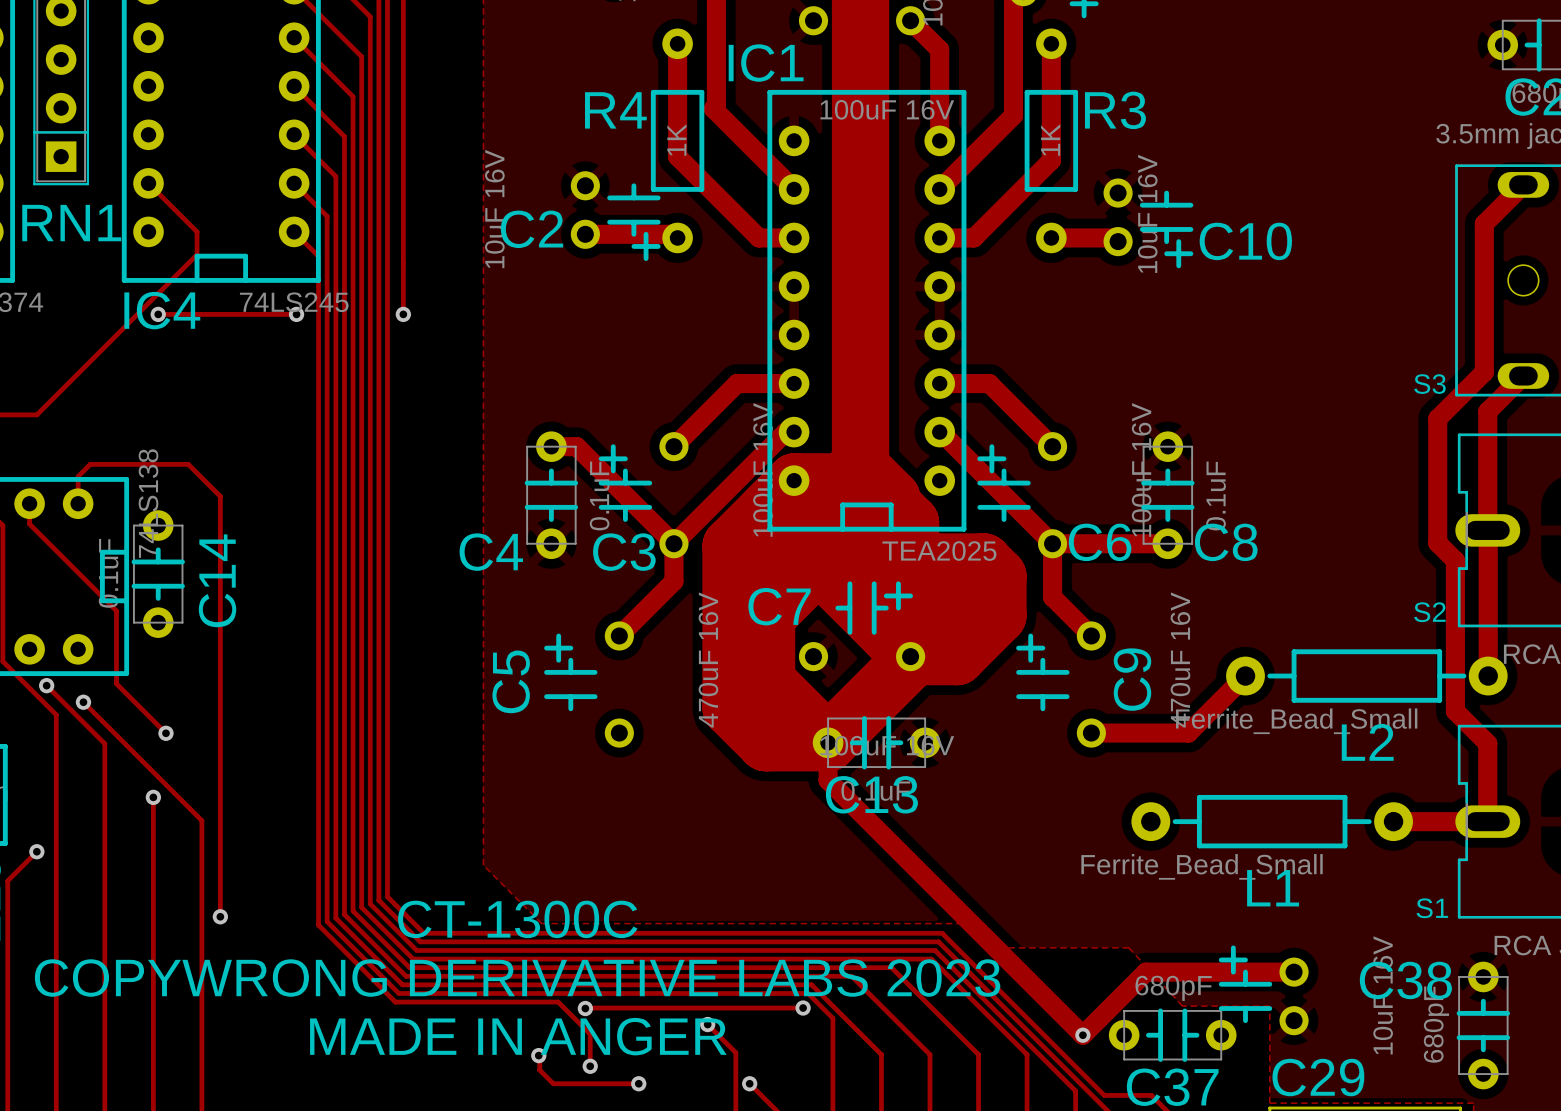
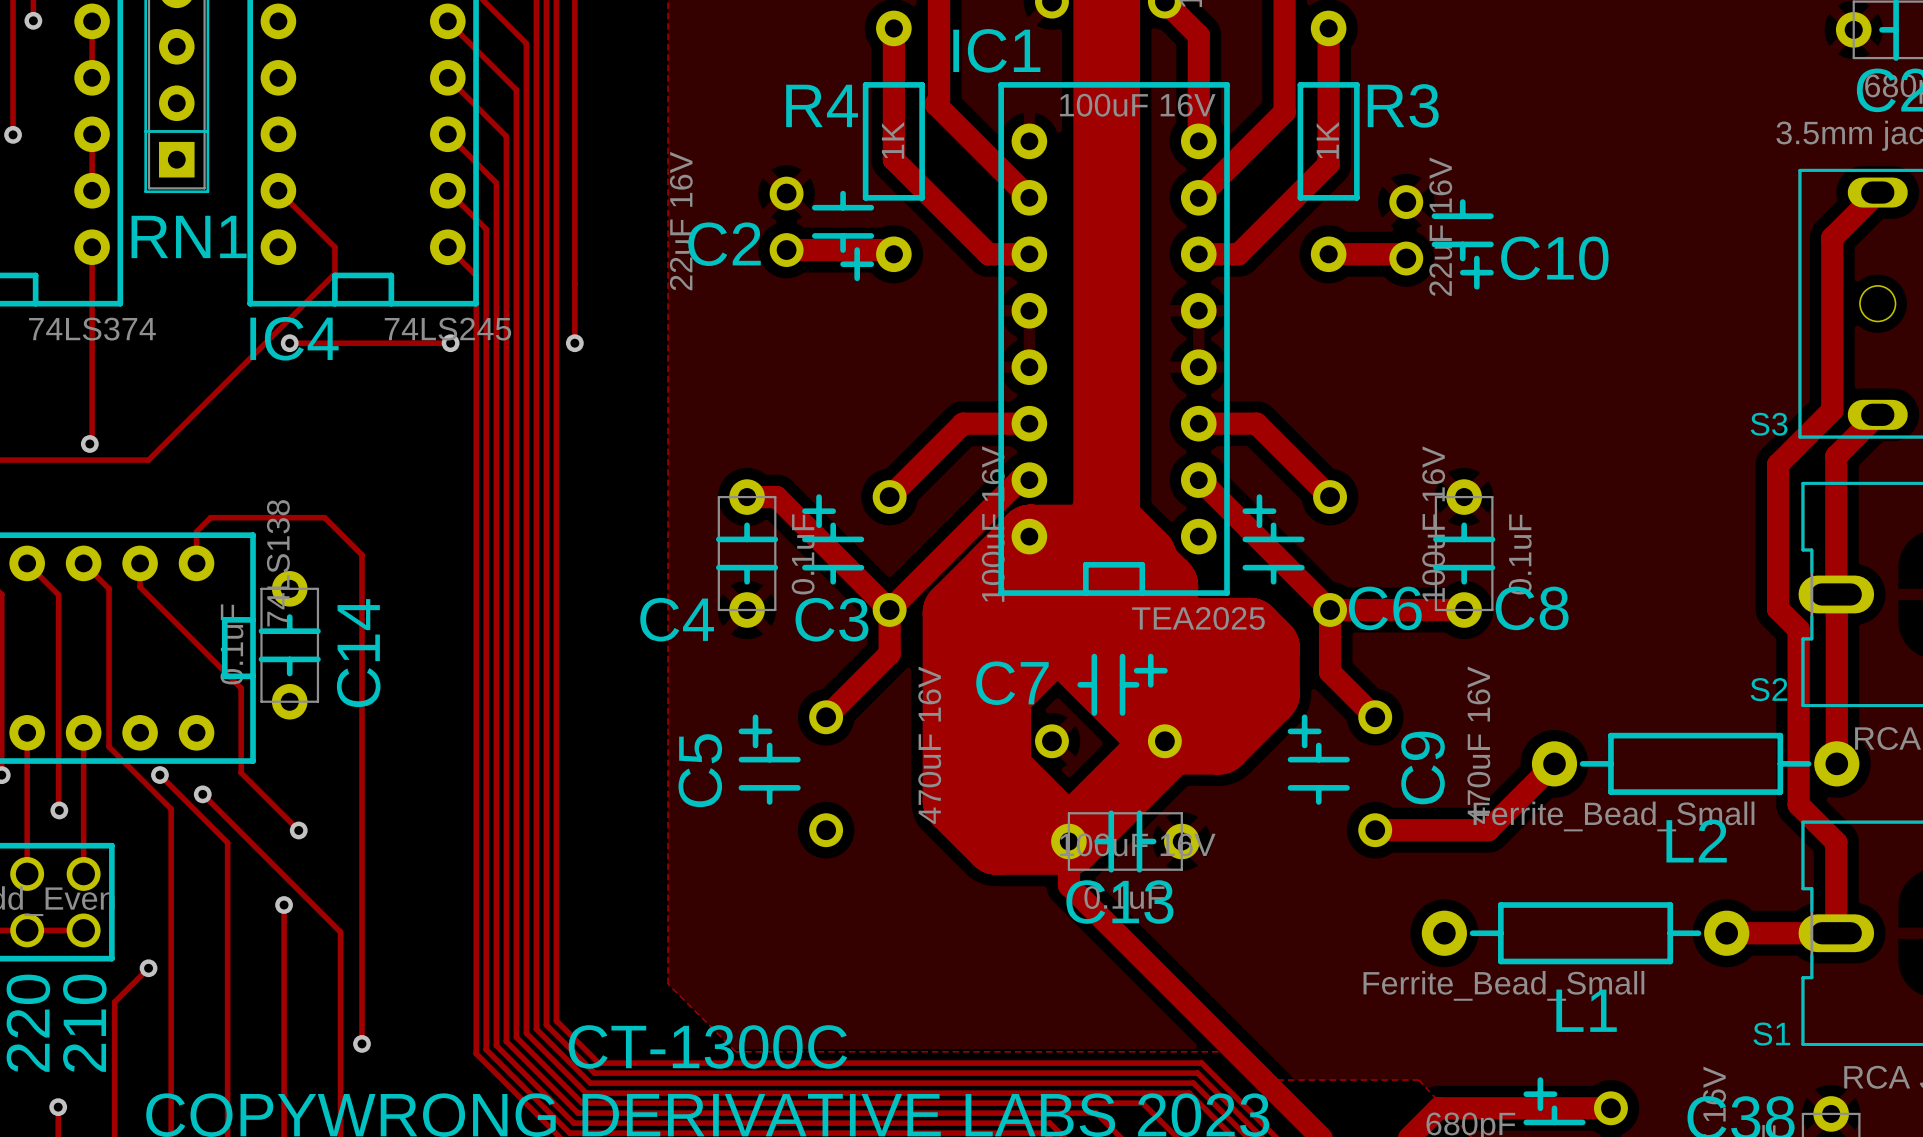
C2 value: 10uF 16V (494, 209) -> 22uF 16V (681, 221)
C10 value: 10uF 16V (1147, 213) -> 22uF 16V (1440, 226)

